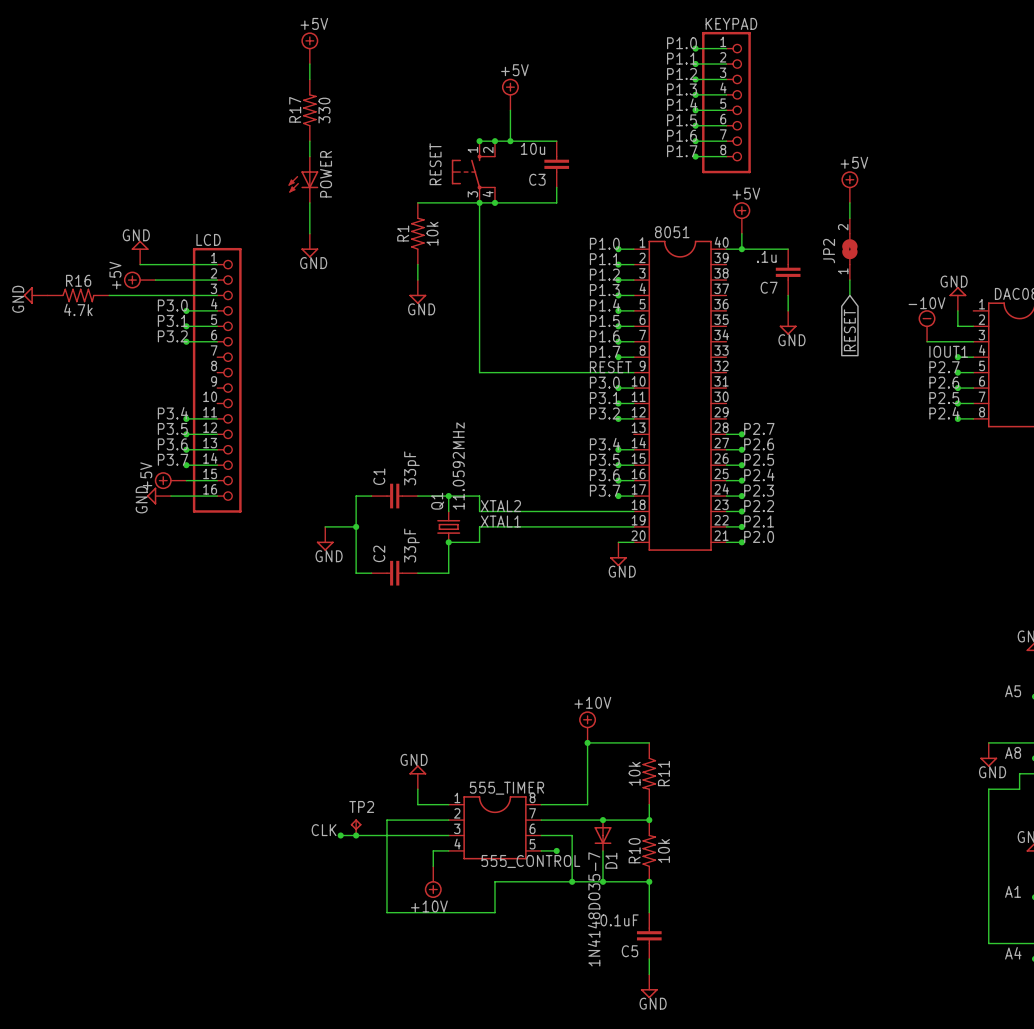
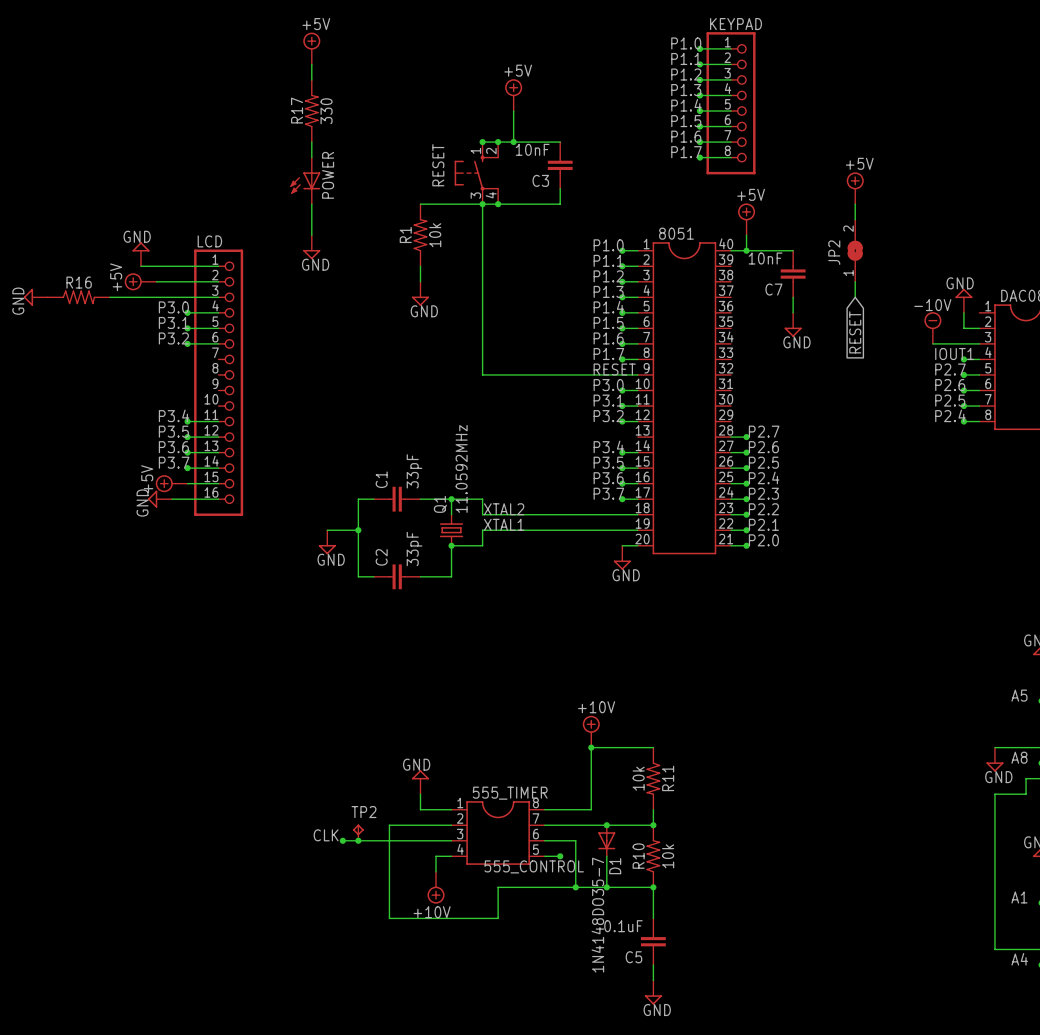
C3 value: 10u (533, 148) -> 10nF (532, 149)
C7 value: .1u (766, 256) -> 10nF (765, 258)
R16 value: 4.7k (78, 309) -> none

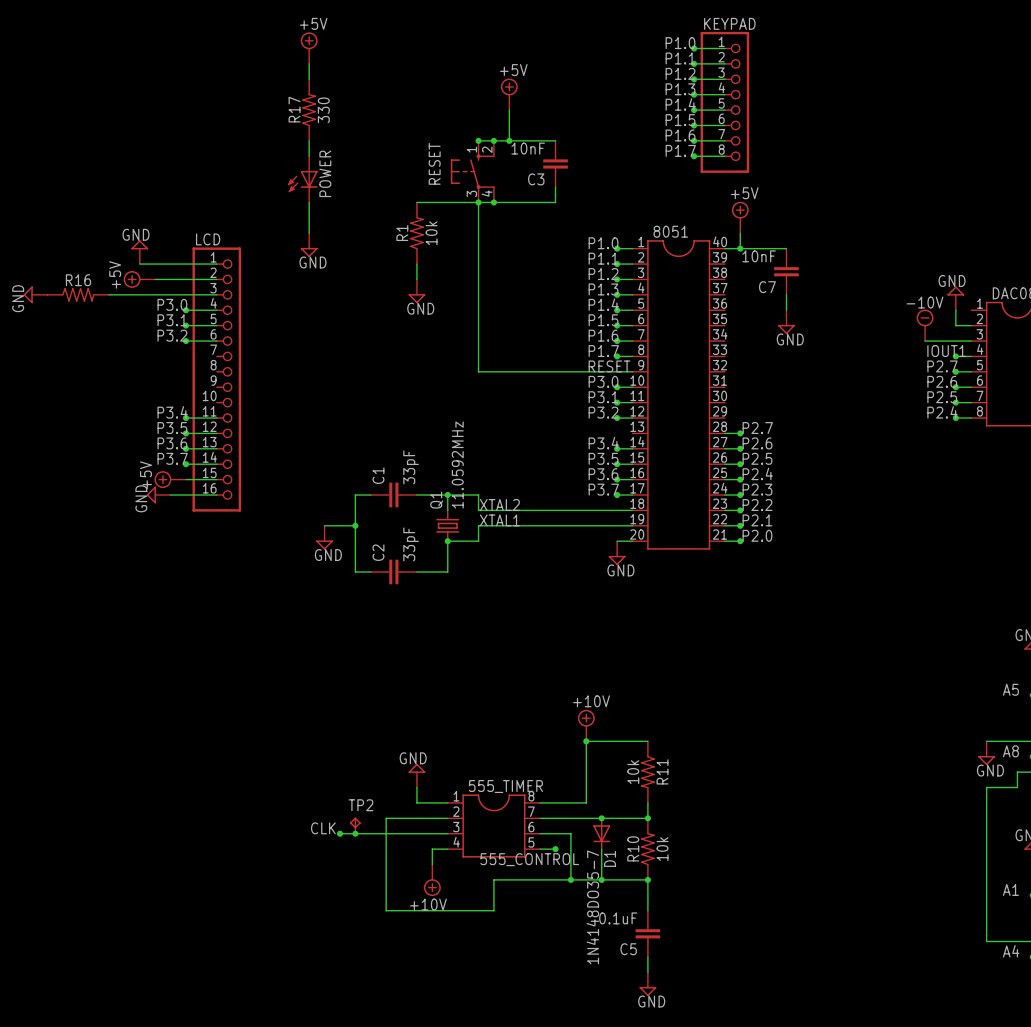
power symbol: +5V (855, 188) -> none
wire: (855, 204) (855, 219) -> none
JP2: (855, 250) -> none
wire: (855, 281) (855, 297) -> none
global label: RESET (855, 332) -> none

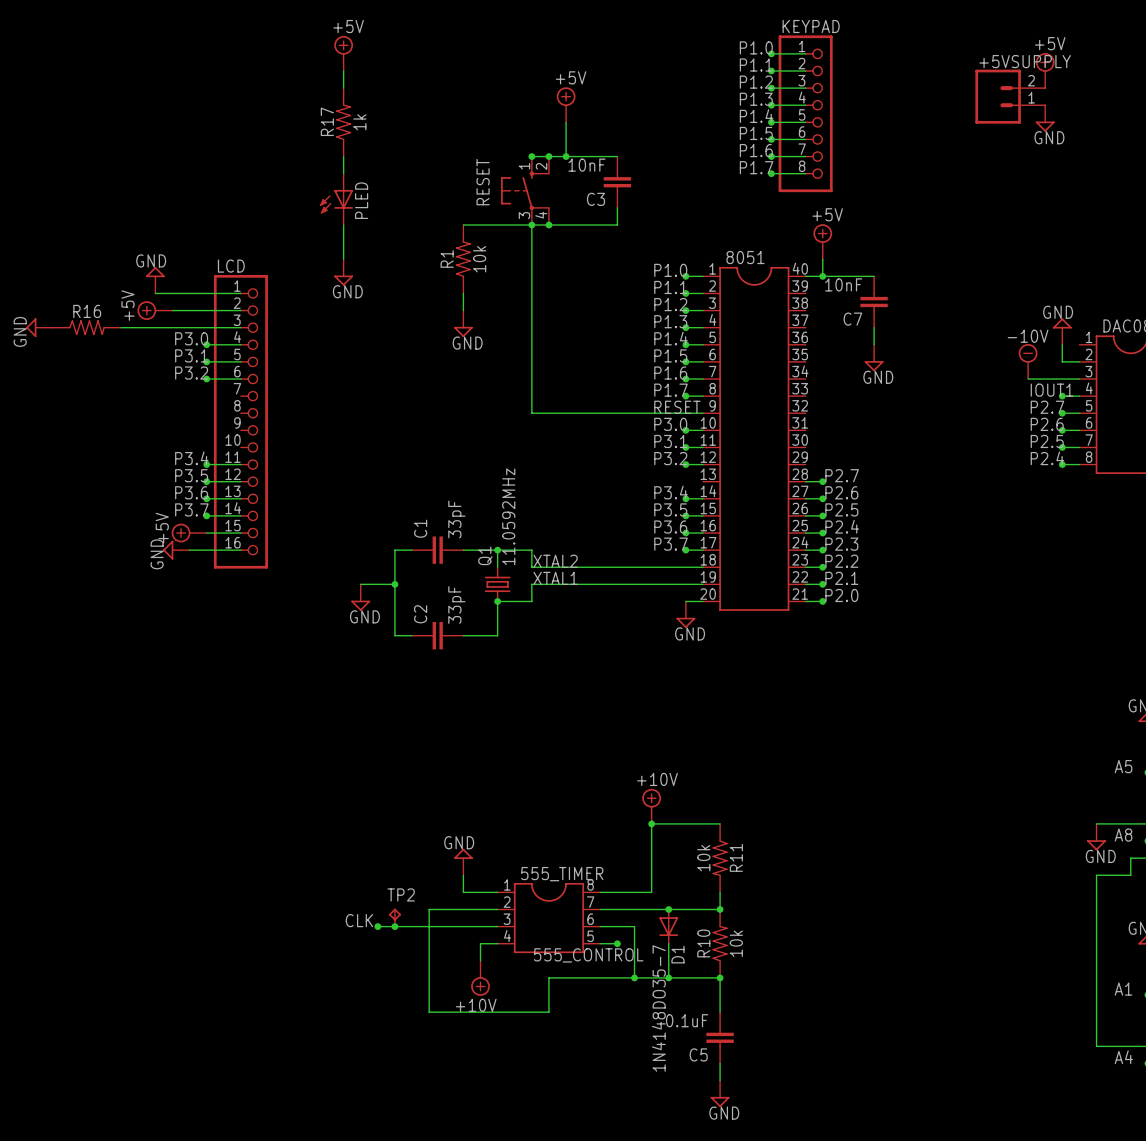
power symbol: none -> +5V (1045, 70)
+5VSUPPLY: none -> (1010, 96)
power symbol: none -> GND (1045, 118)
R17 value: 330 (323, 110) -> 1k (359, 122)
POWER name: POWER (325, 173) -> PLED (361, 200)

